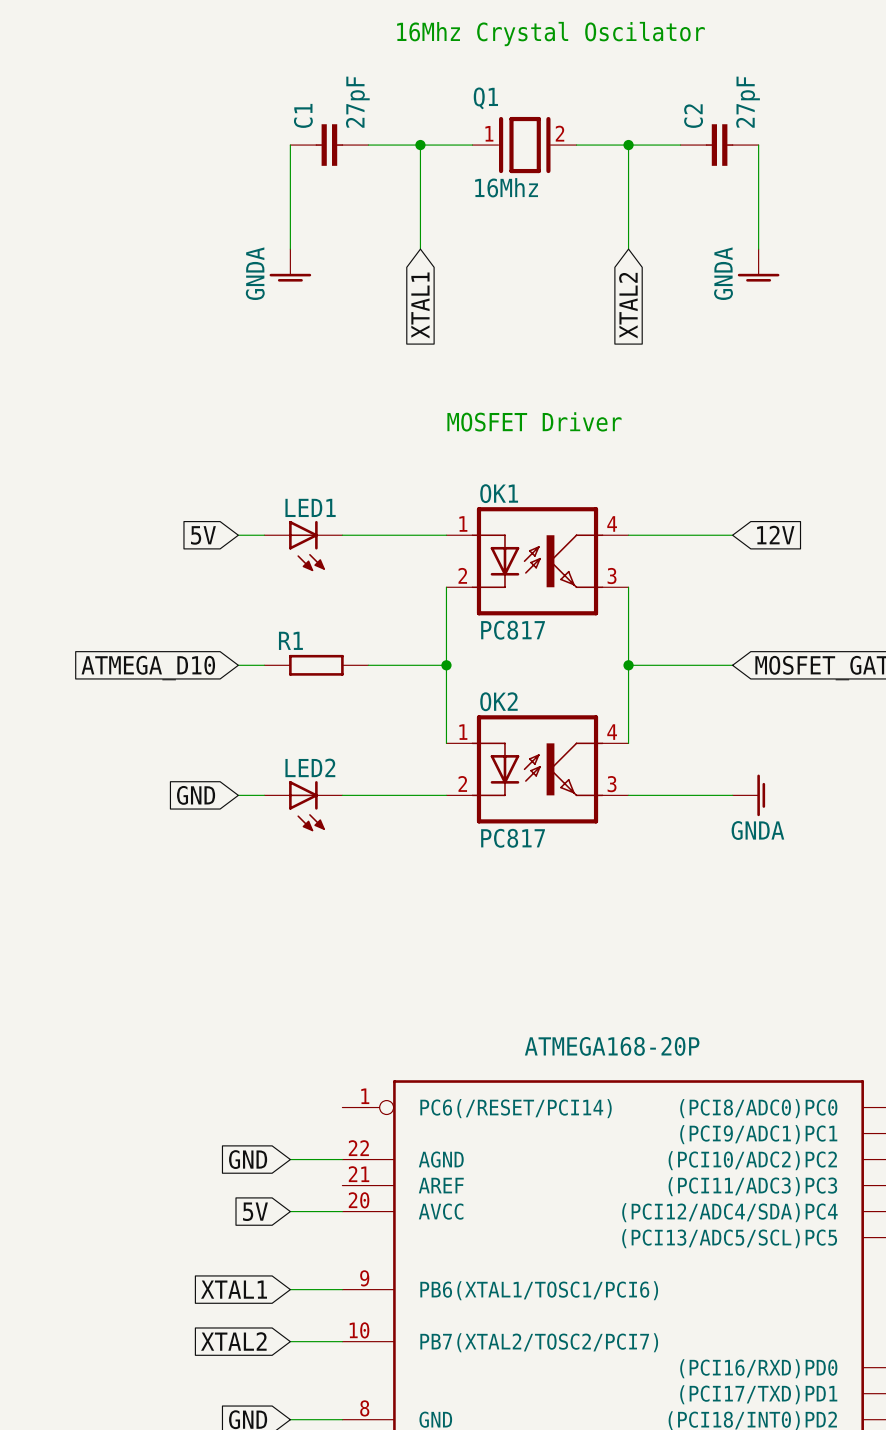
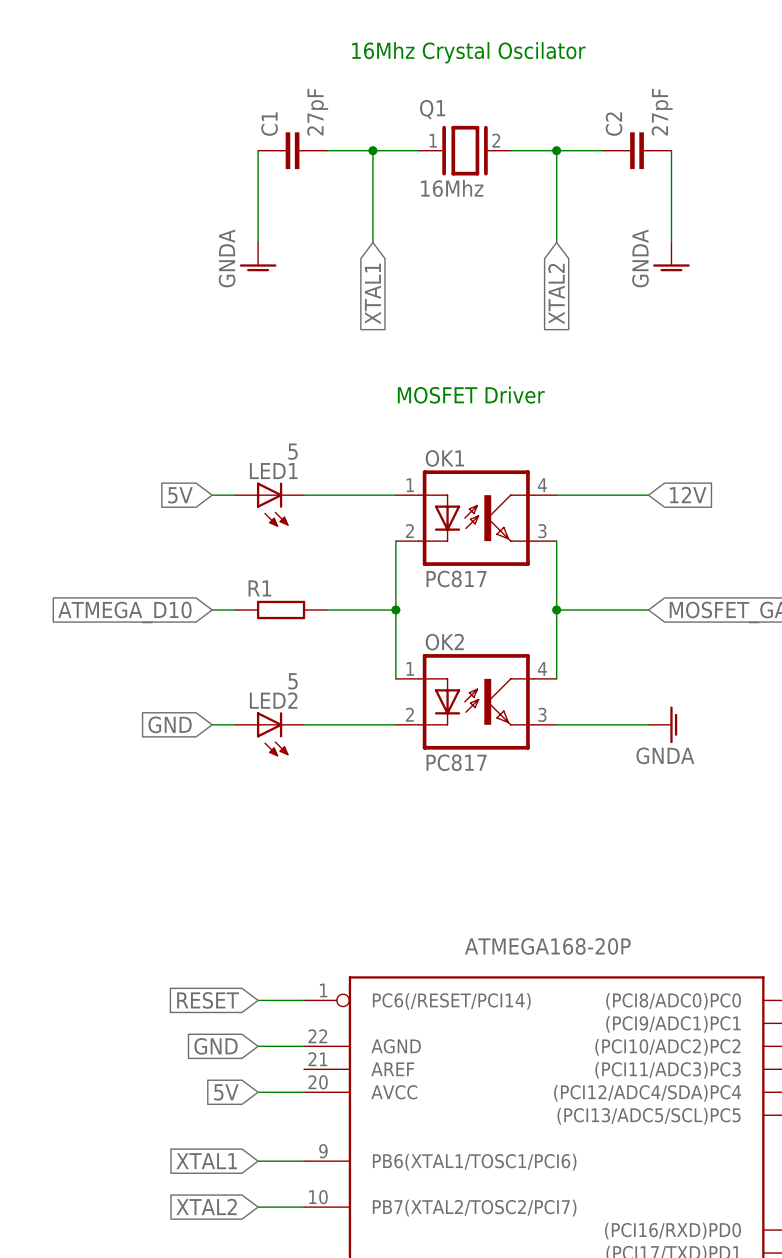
LED1 value: none -> 5 (293, 451)
LED2 value: none -> 5 (293, 681)
global label: none -> RESET (208, 1000)
wire: none -> (258, 1000) (304, 1000)

